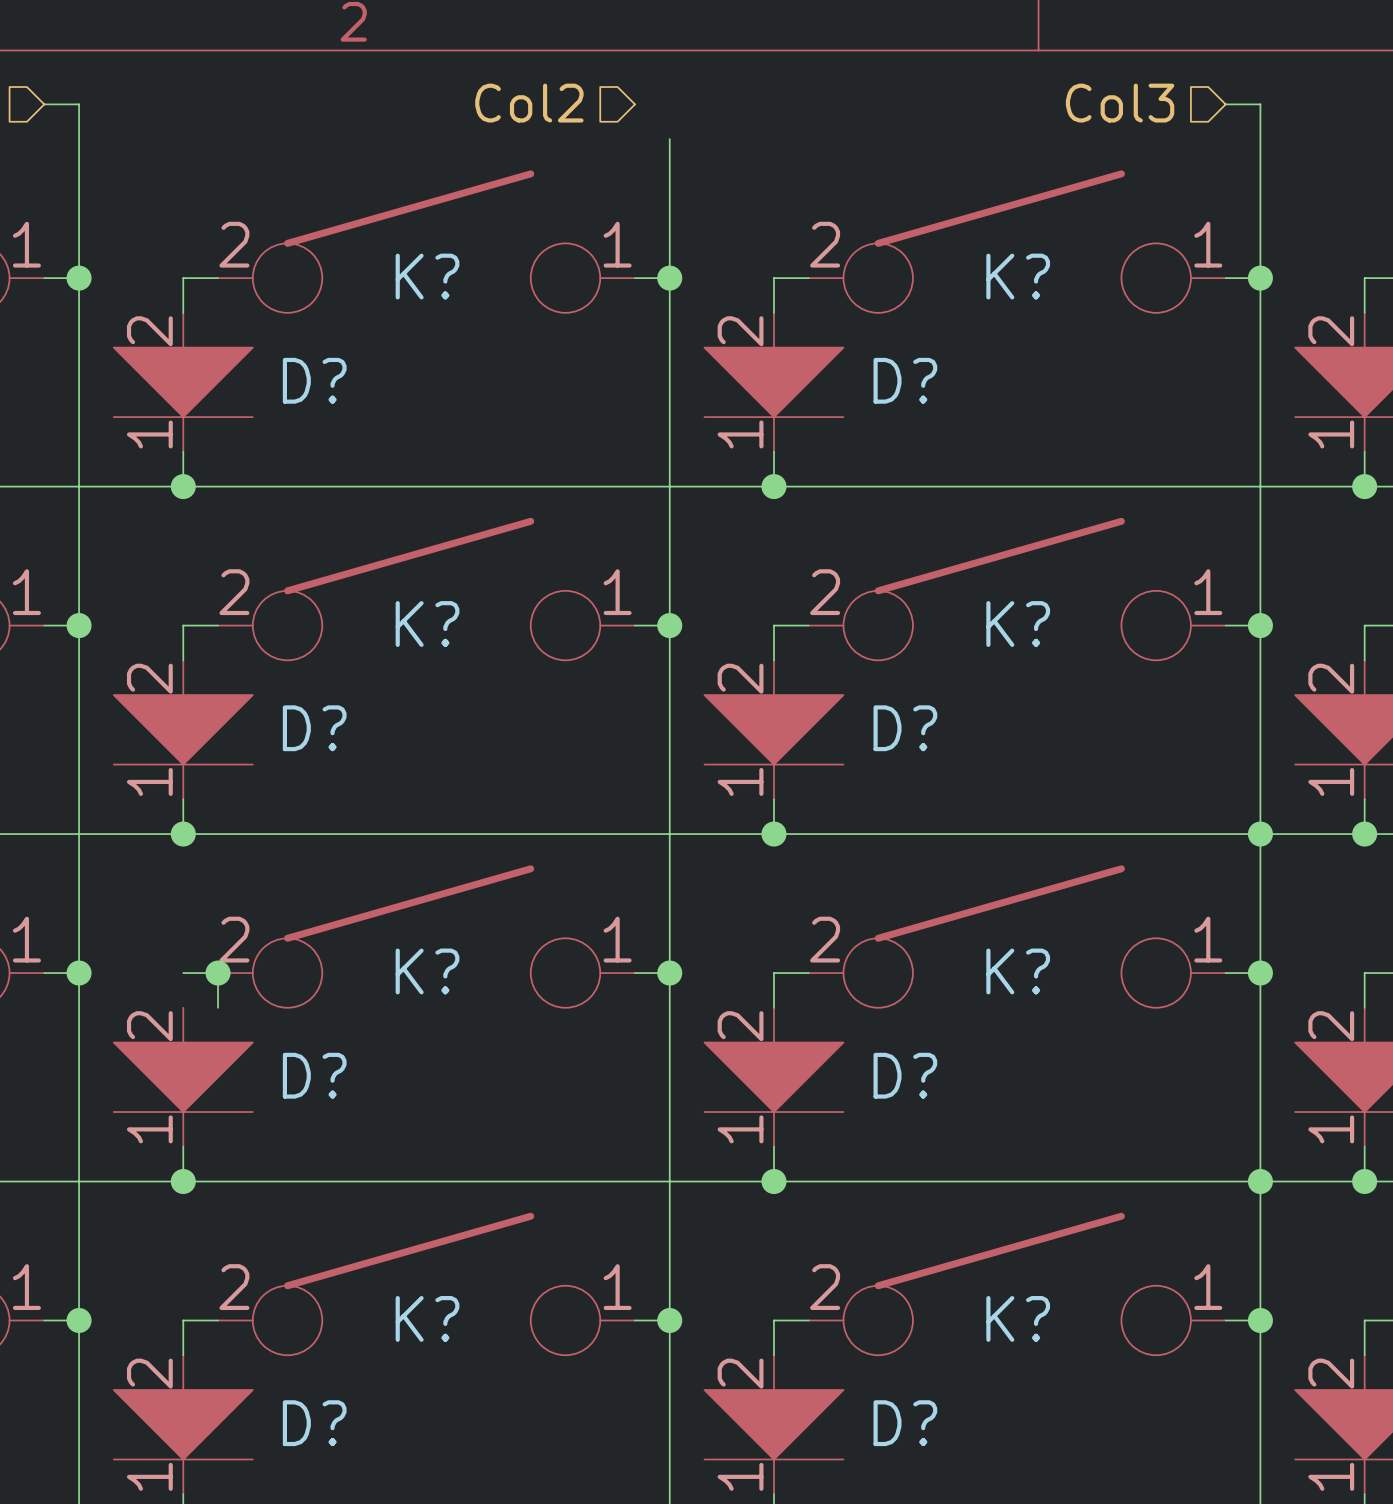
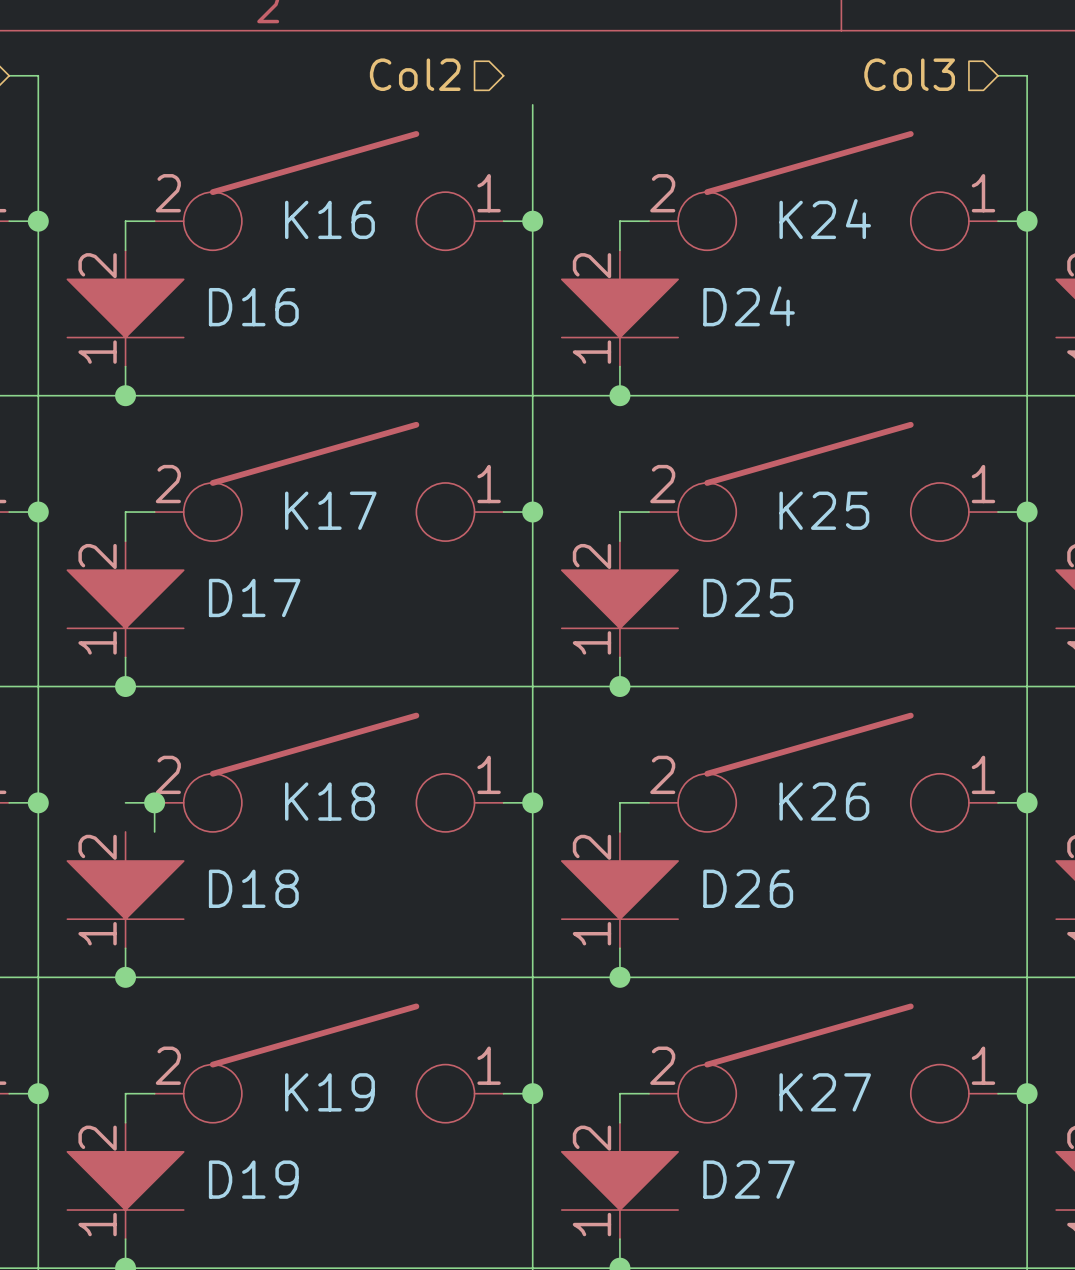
K? name: K? (427, 276) -> K16 (329, 219)
K? name: K? (1018, 276) -> K24 (825, 219)
D? name: D? (314, 380) -> D16 (253, 307)
D? name: D? (905, 380) -> D24 (749, 306)
K? name: K? (427, 624) -> K17 (330, 510)
K? name: K? (1018, 624) -> K25 (824, 510)
D? name: D? (314, 728) -> D17 (254, 597)
D? name: D? (905, 728) -> D25 (748, 597)
junction: (1260, 834) -> none
K? name: K? (427, 971) -> K18 (329, 801)
K? name: K? (1018, 971) -> K26 (824, 801)
D? name: D? (314, 1075) -> D18 (253, 888)
D? name: D? (905, 1075) -> D26 (748, 888)
junction: (1260, 1181) -> none
K? name: K? (427, 1318) -> K19 (329, 1092)
K? name: K? (1018, 1318) -> K27 (825, 1092)
D? name: D? (314, 1423) -> D19 (253, 1179)
D? name: D? (905, 1423) -> D27 (749, 1179)

